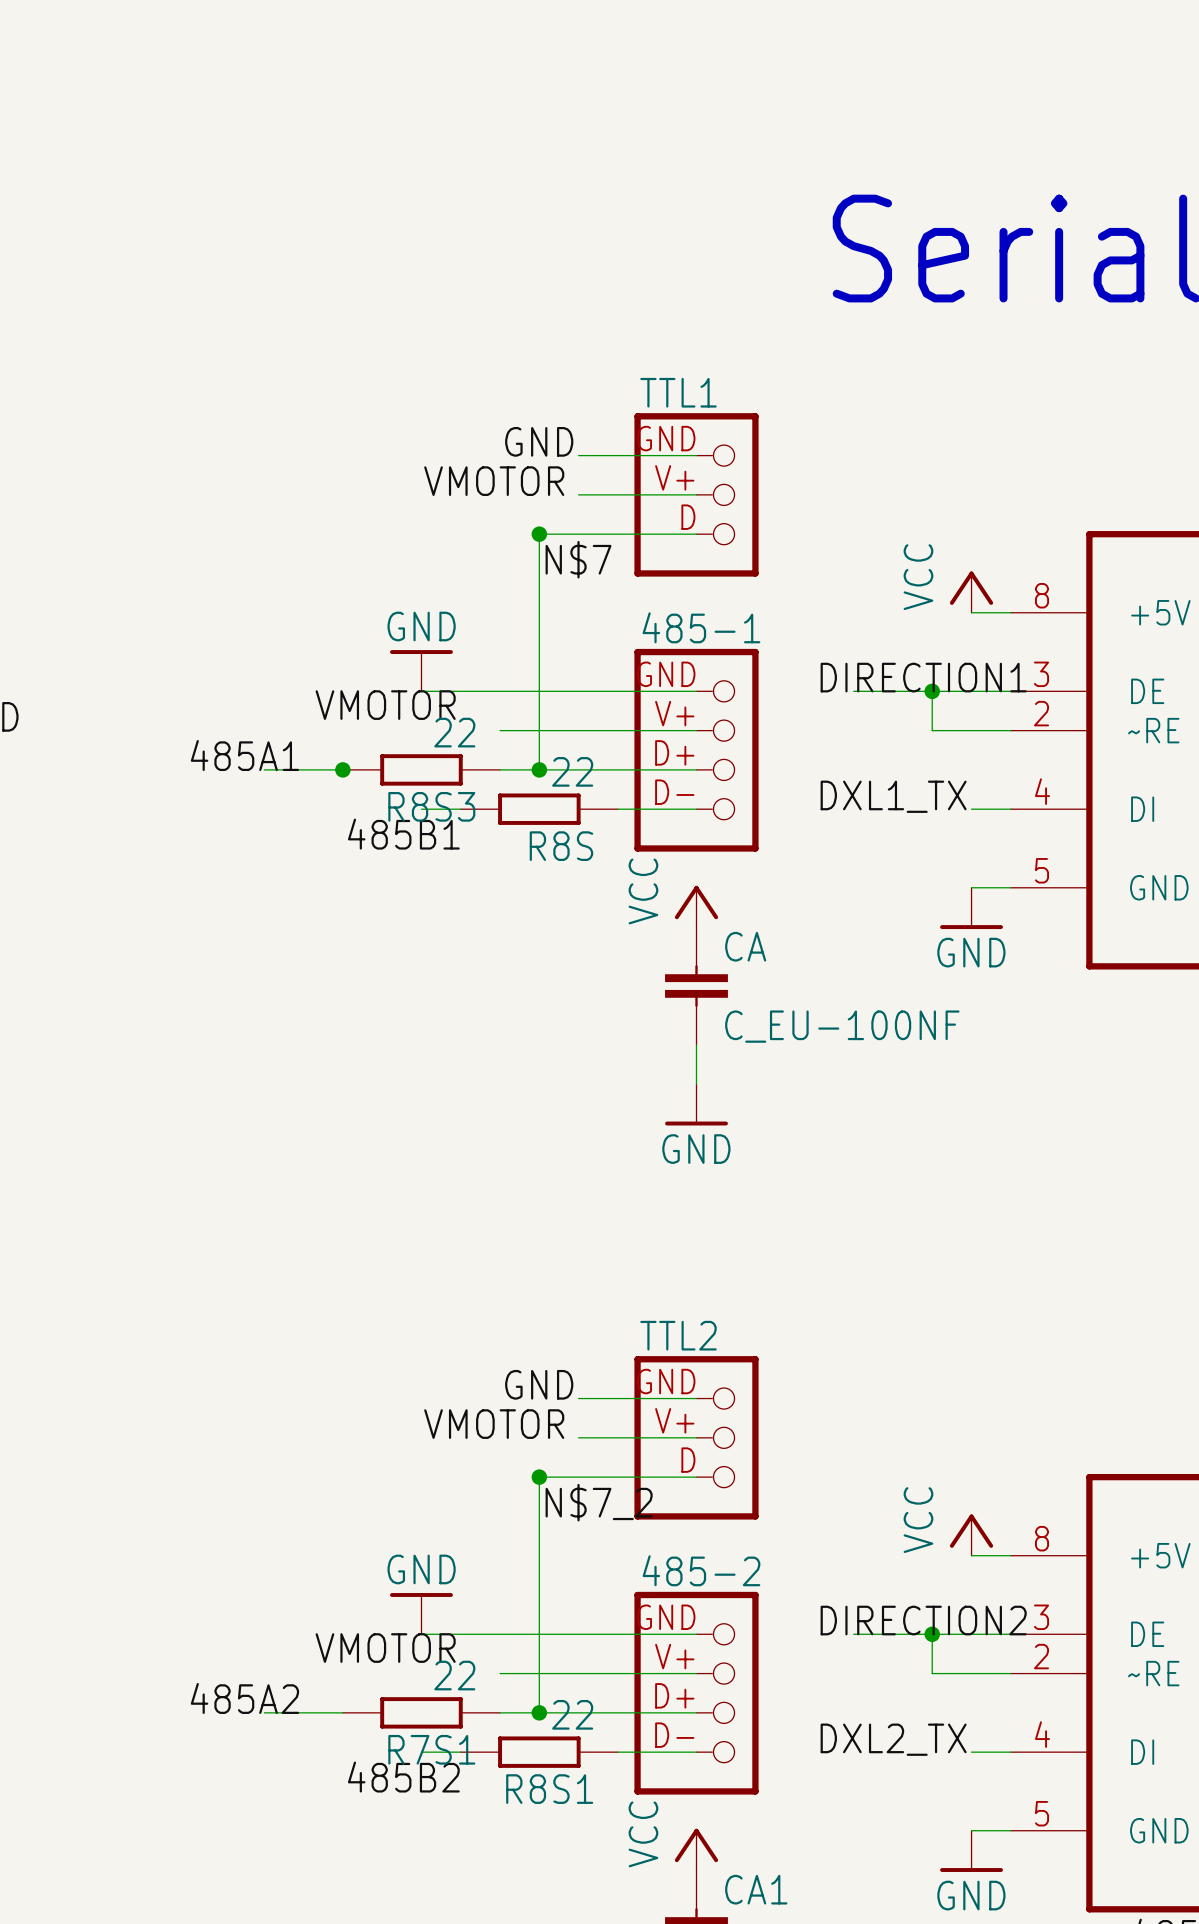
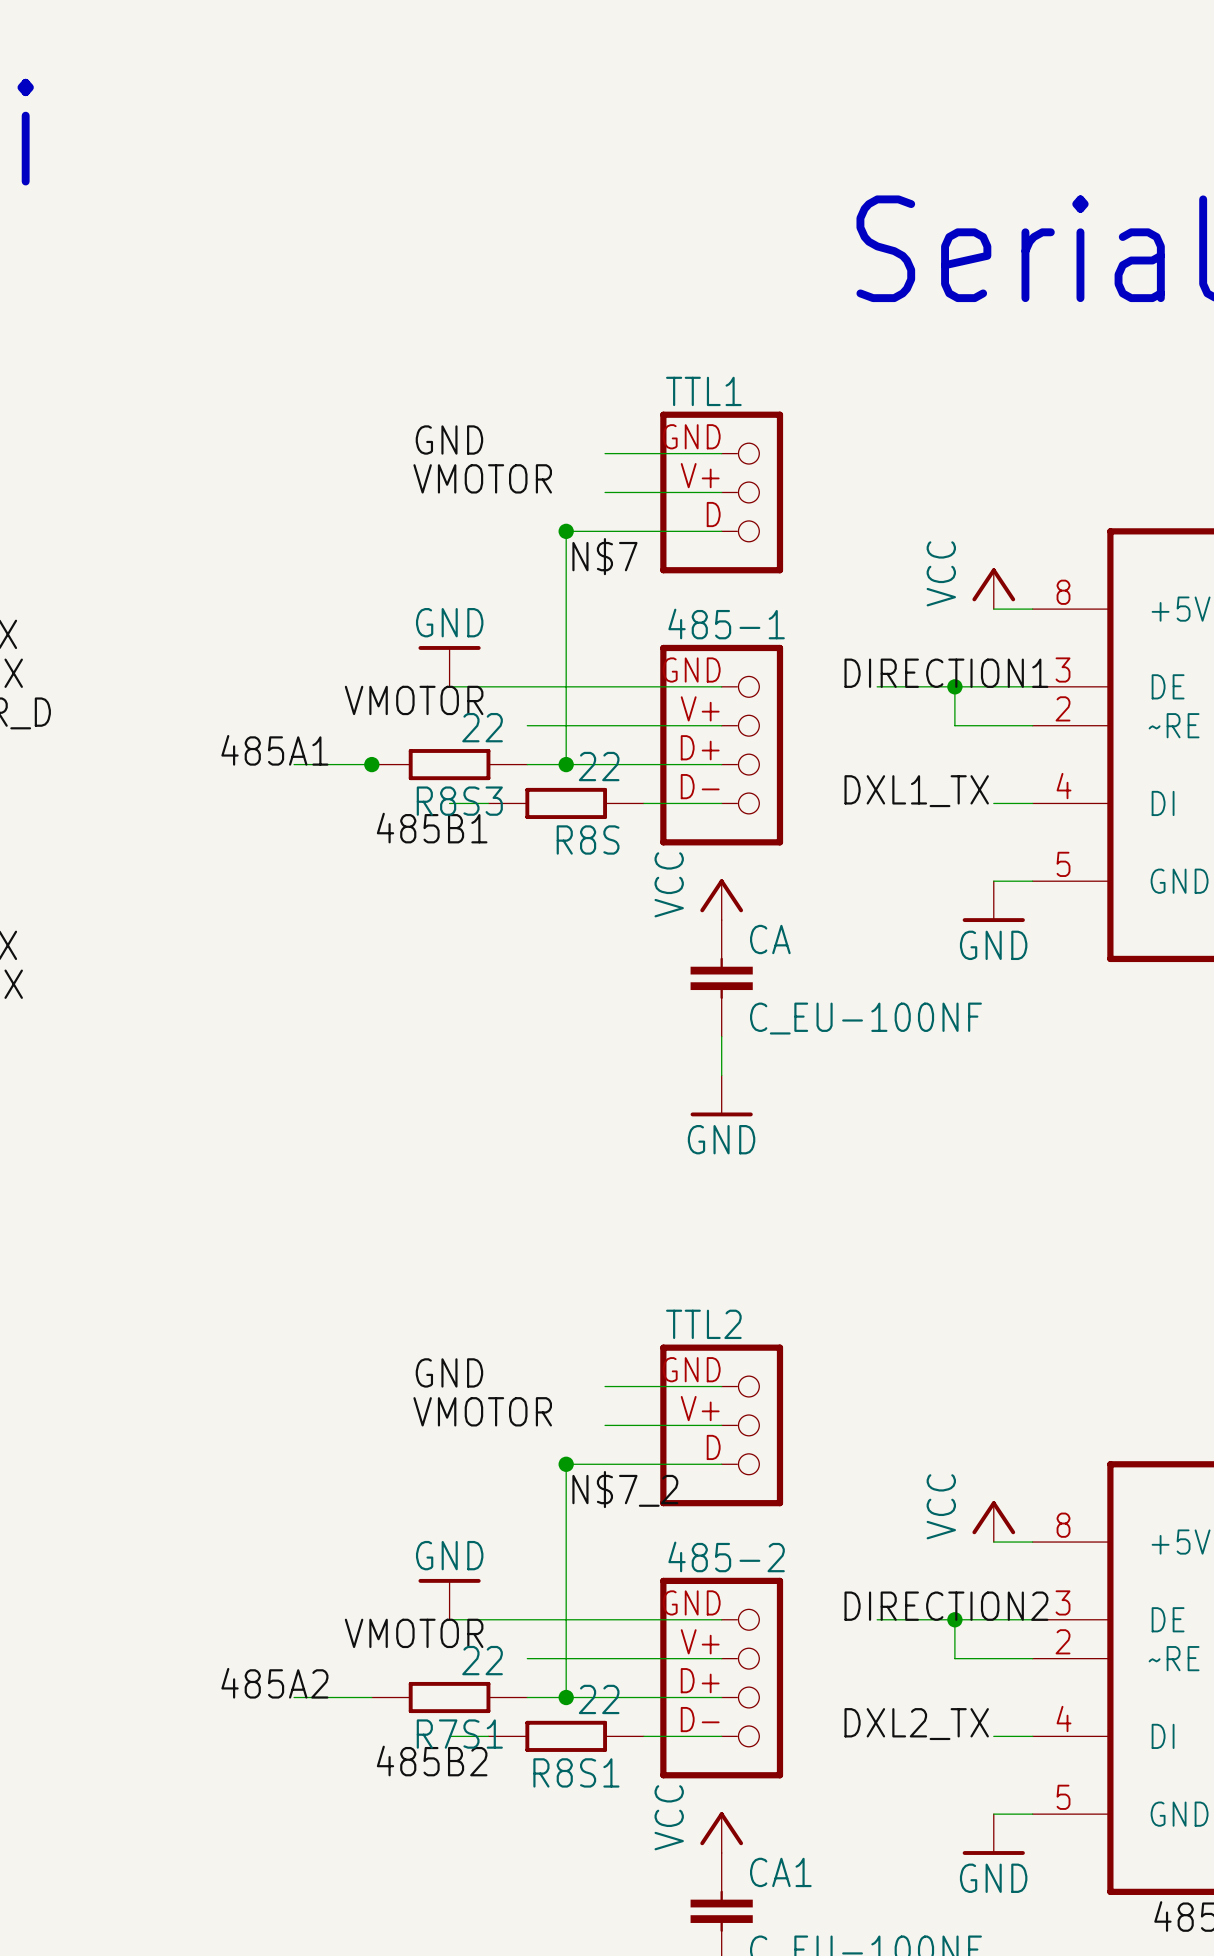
label position: GND (539, 441) -> GND (449, 440)
label position: VMOTOR (494, 481) -> VMOTOR (482, 478)
label position: GND (539, 1384) -> GND (449, 1372)
label position: VMOTOR (494, 1424) -> VMOTOR (482, 1411)

